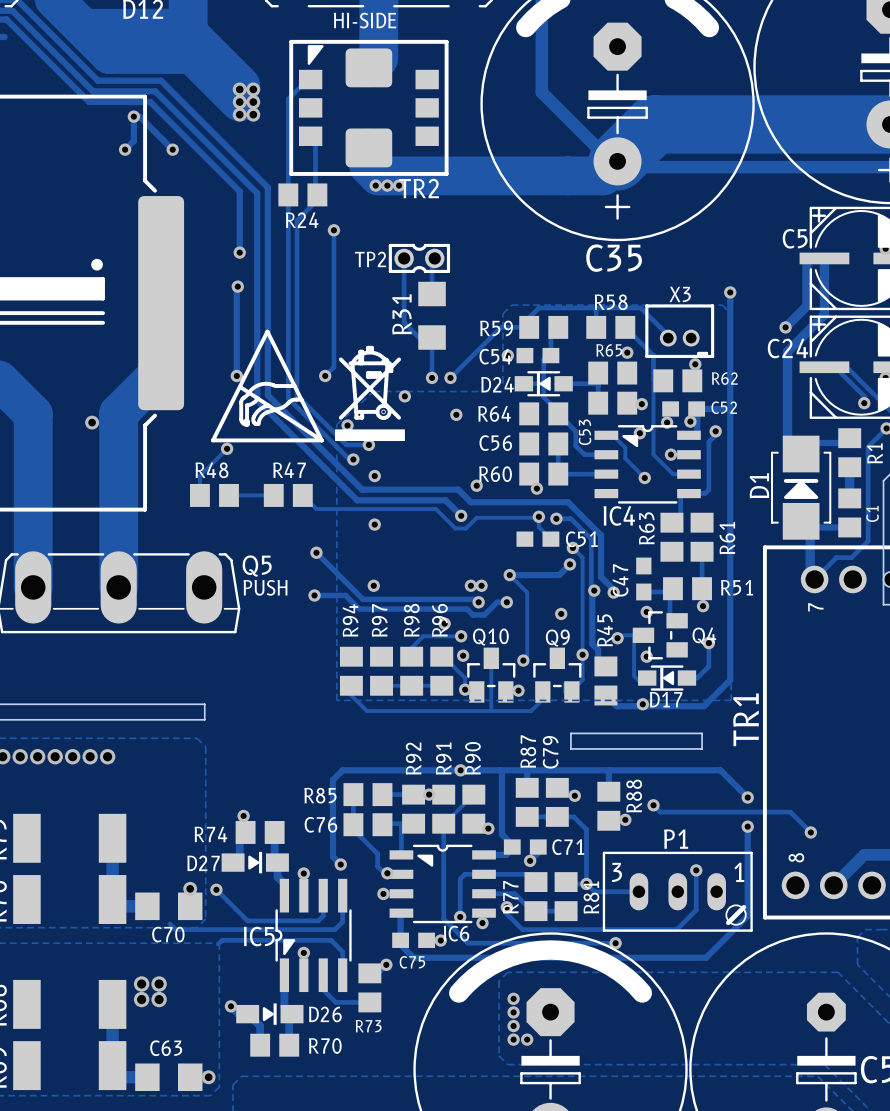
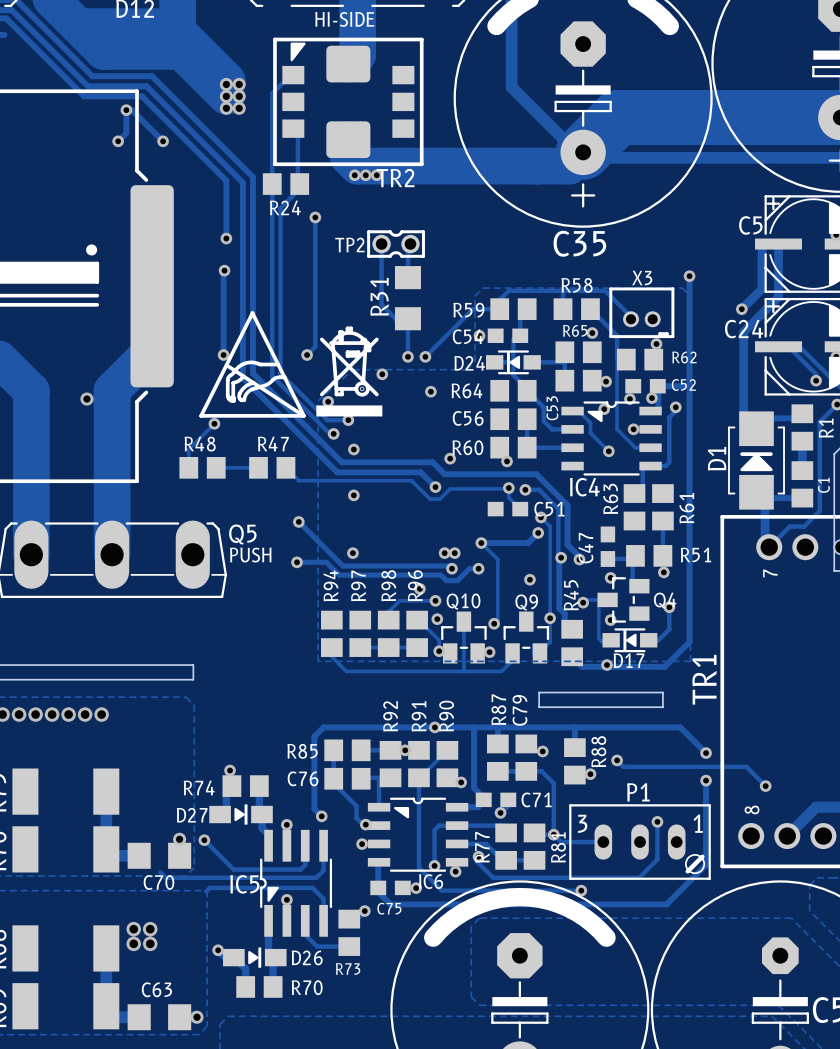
via: (513, 998) -> none
via: (513, 1012) -> none
via: (513, 1026) -> none
via: (513, 1039) -> none
via: (527, 1039) -> none

